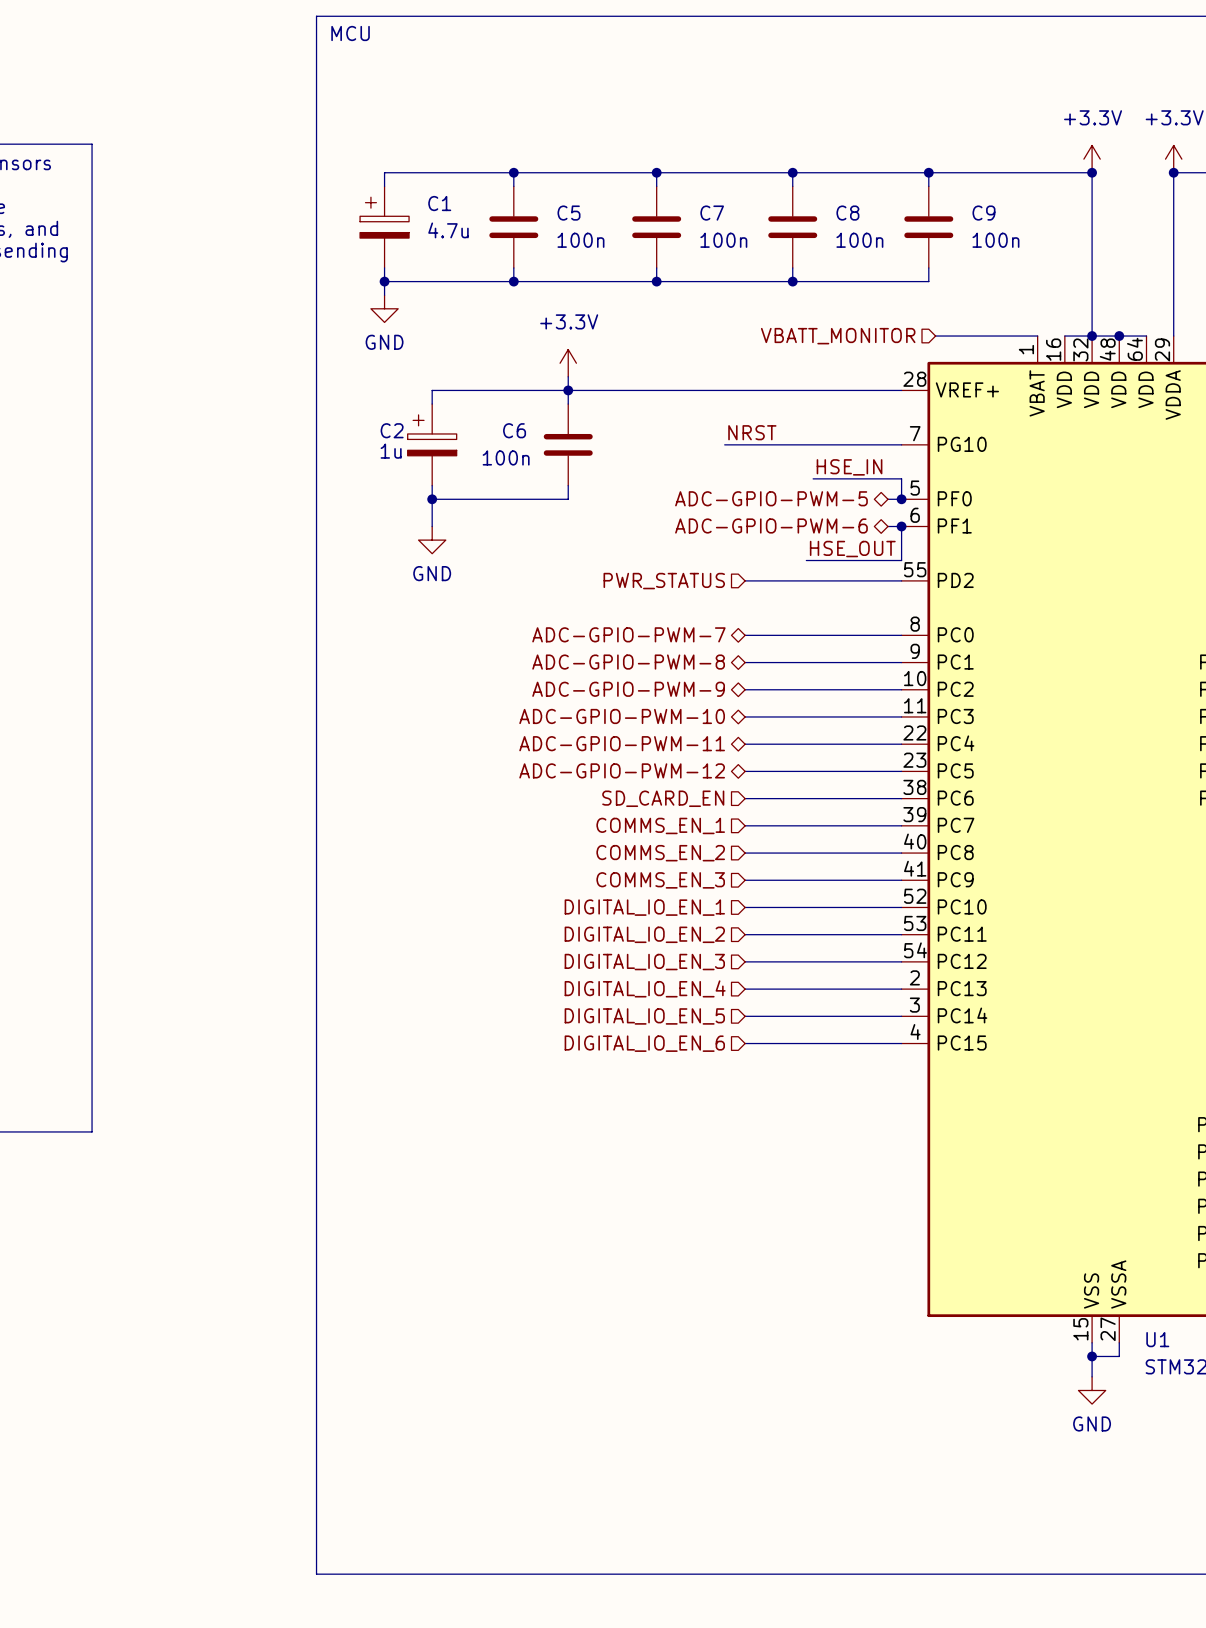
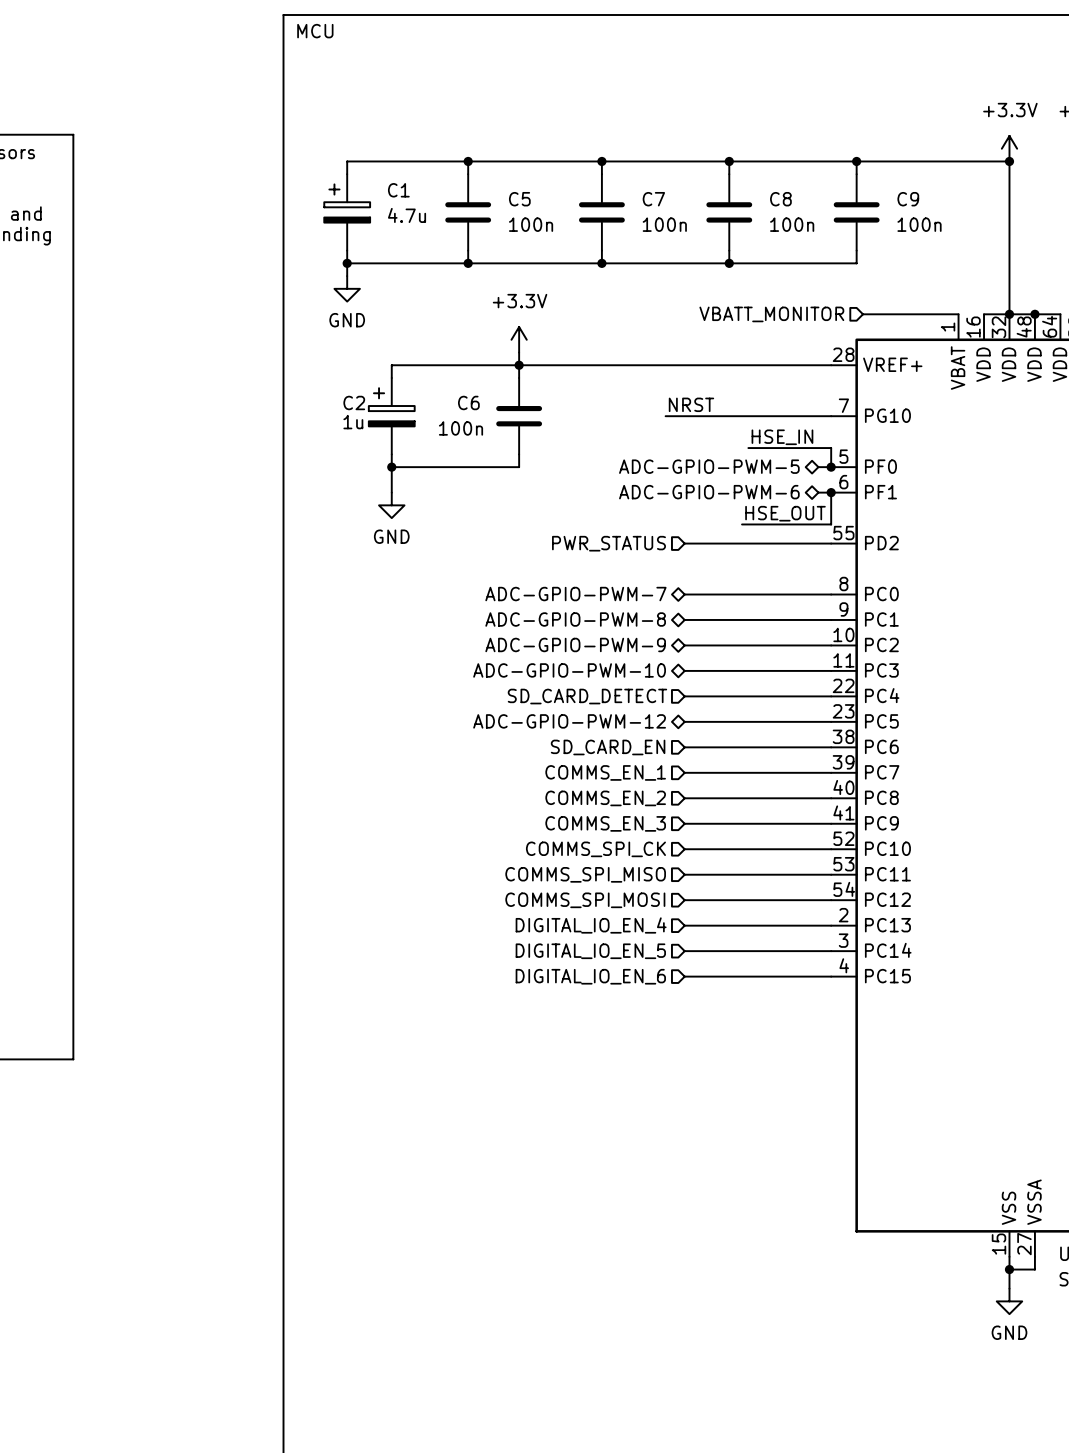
hierarchical label shape: bidirectional (622, 743) -> input (587, 696)
hierarchical label: ADC-GPIO-PWM-11 (622, 743) -> SD_CARD_DETECT (587, 696)
hierarchical label: DIGITAL_IO_EN_1 (644, 907) -> COMMS_SPI_CK (595, 849)
hierarchical label: DIGITAL_IO_EN_2 (644, 934) -> COMMS_SPI_MISO (585, 874)
hierarchical label: DIGITAL_IO_EN_3 (644, 962) -> COMMS_SPI_MOSI (585, 900)

